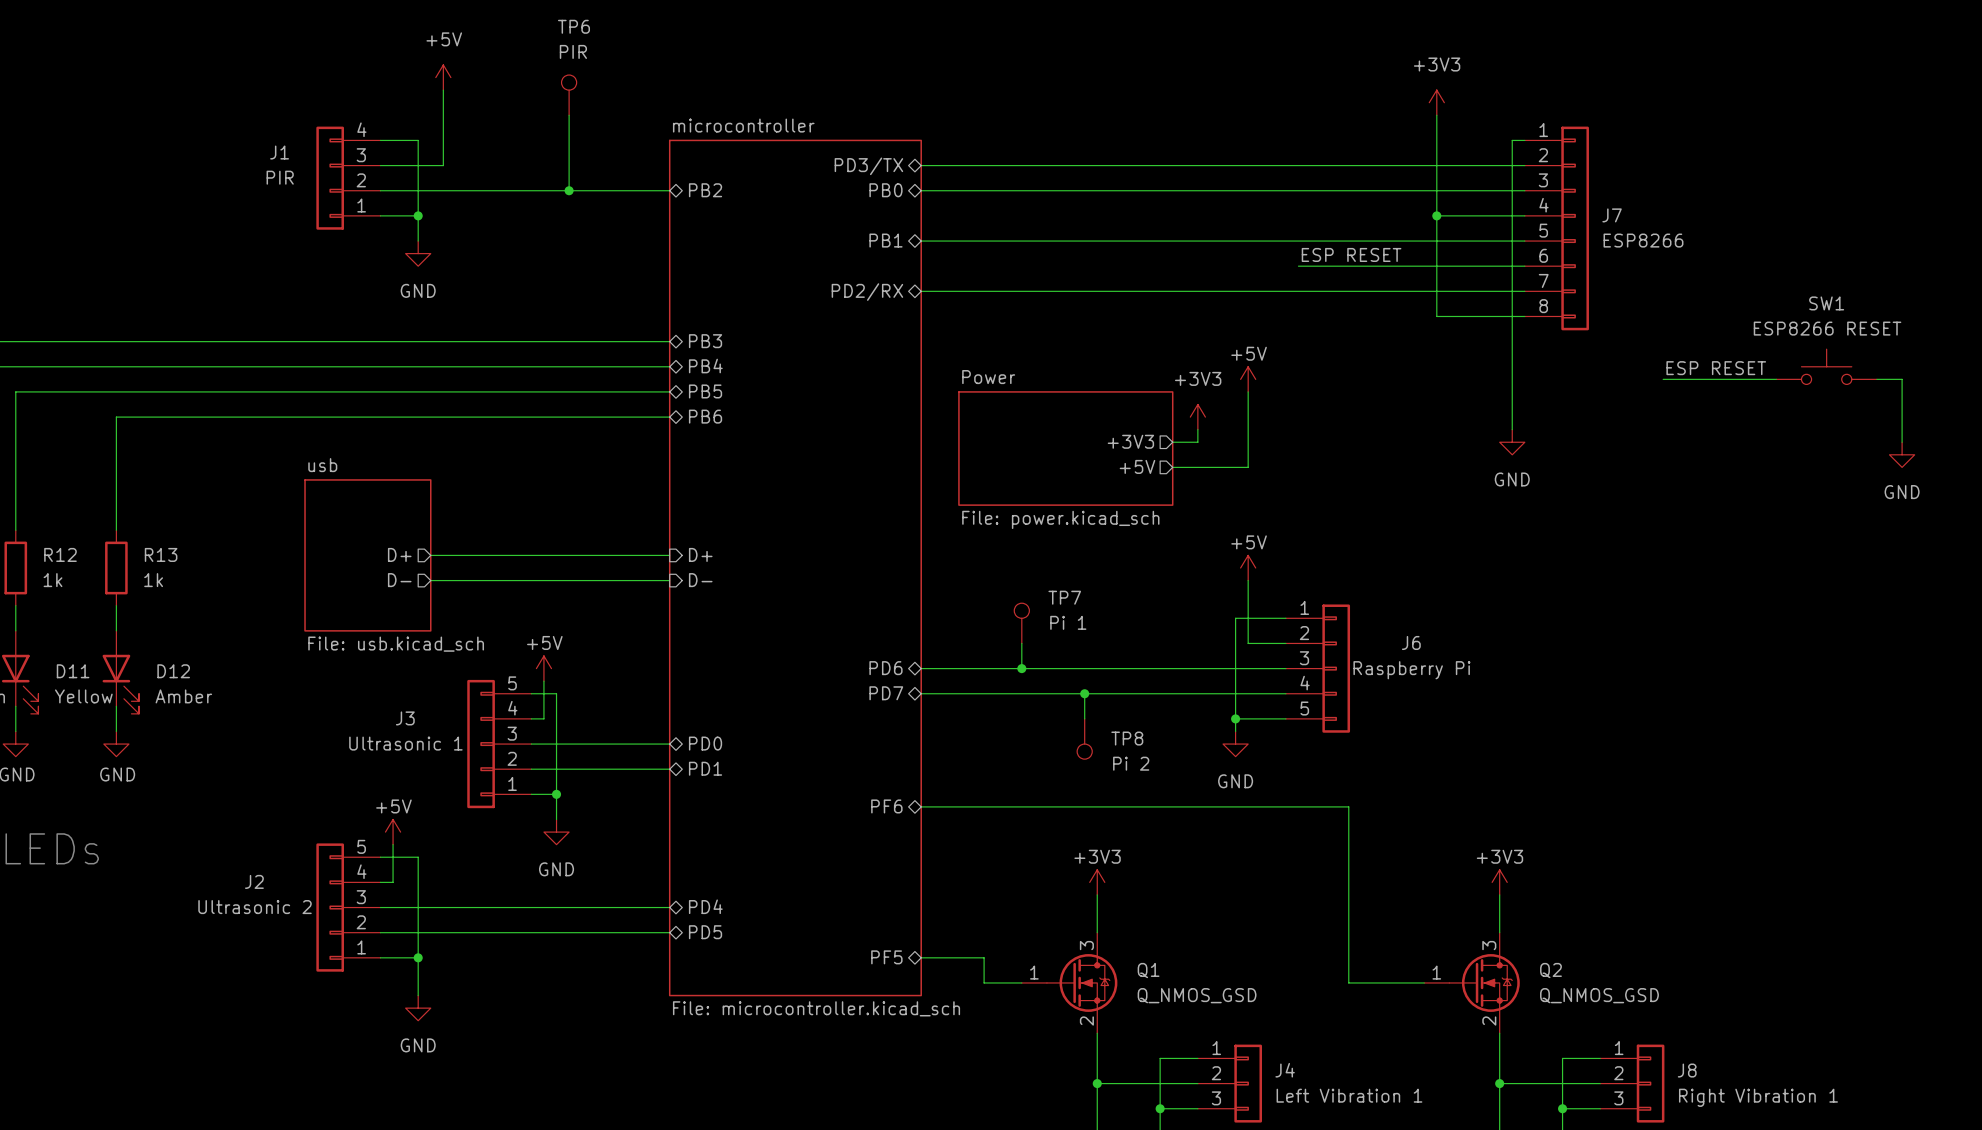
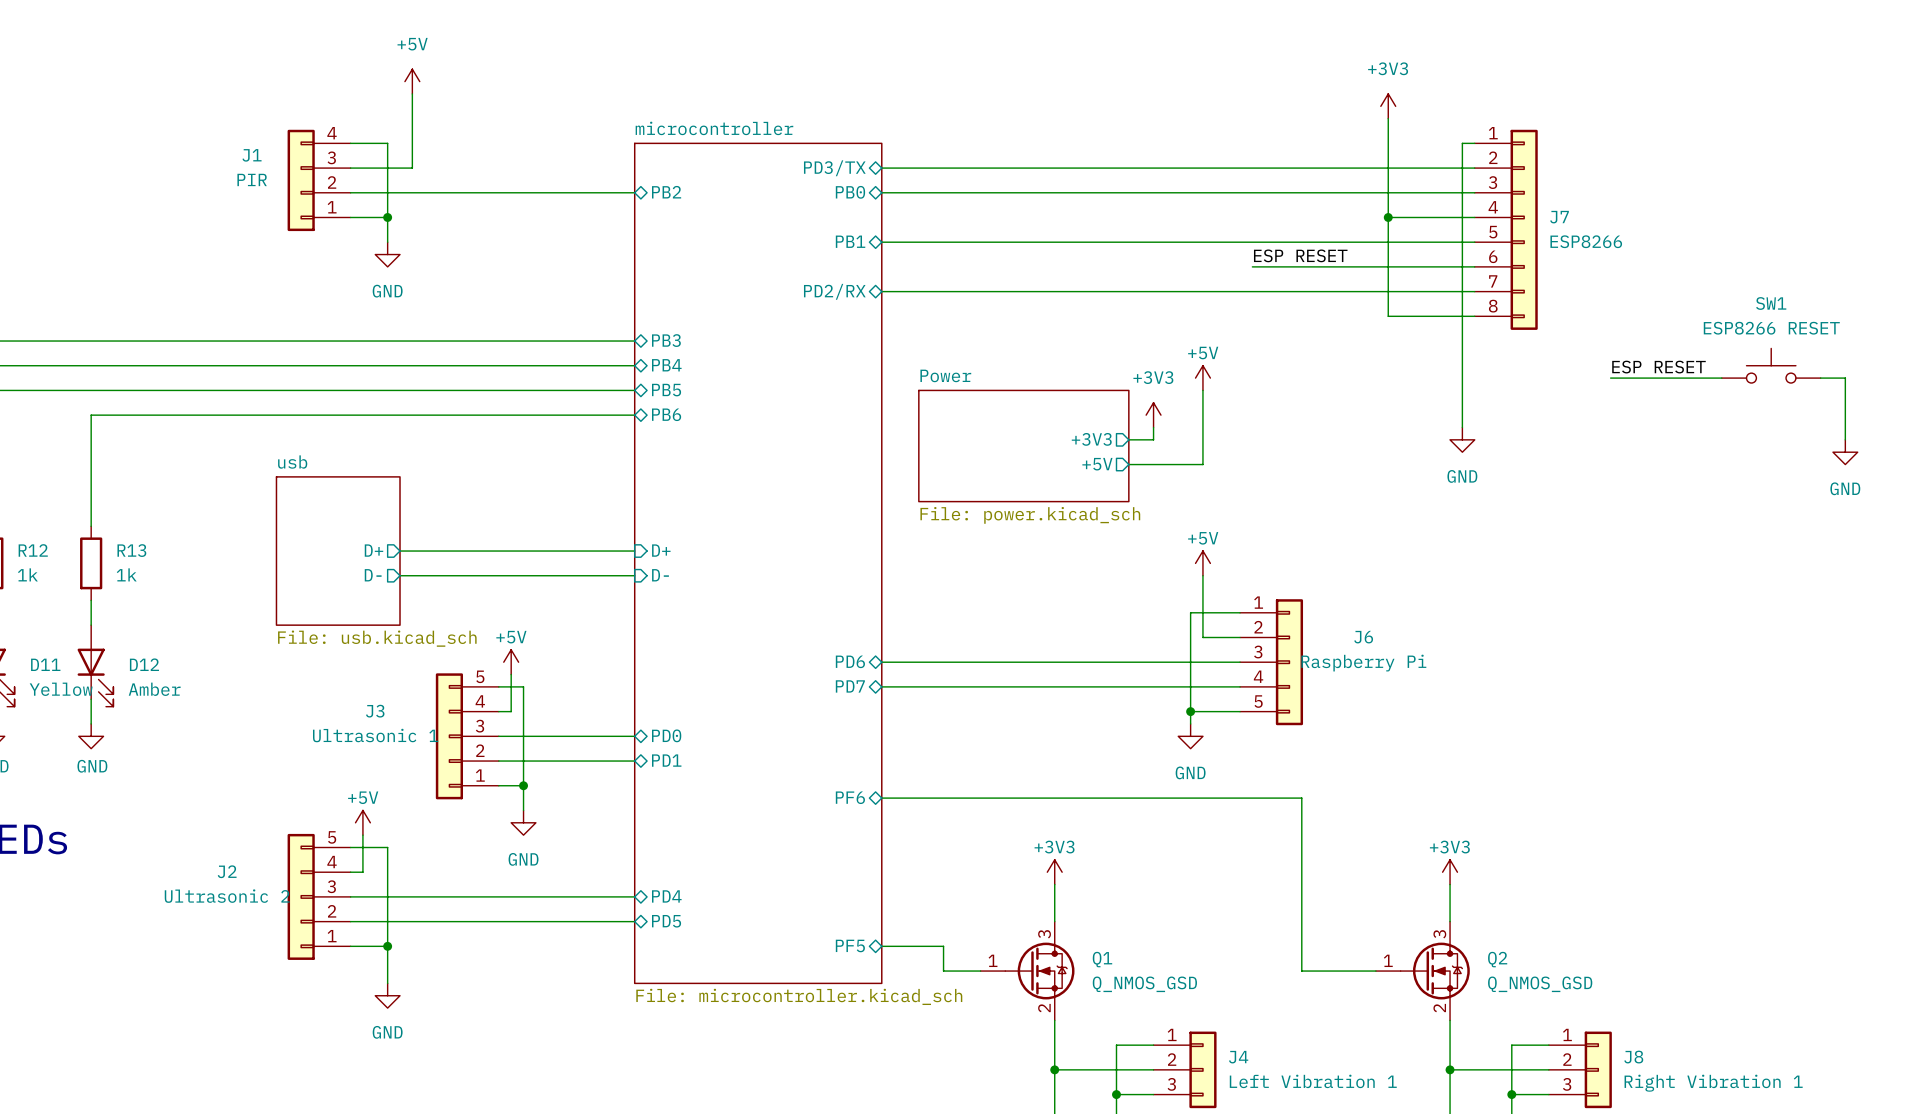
TP6: PIR (569, 95) -> none
wire: (569, 115) (569, 190) -> none
junction: (569, 190) -> none
TP7: Pi 1 (1021, 623) -> none
wire: (1021, 643) (1021, 668) -> none
junction: (1021, 668) -> none
wire: (1084, 693) (1084, 718) -> none
junction: (1084, 693) -> none
TP8: Pi 2 (1084, 739) -> none

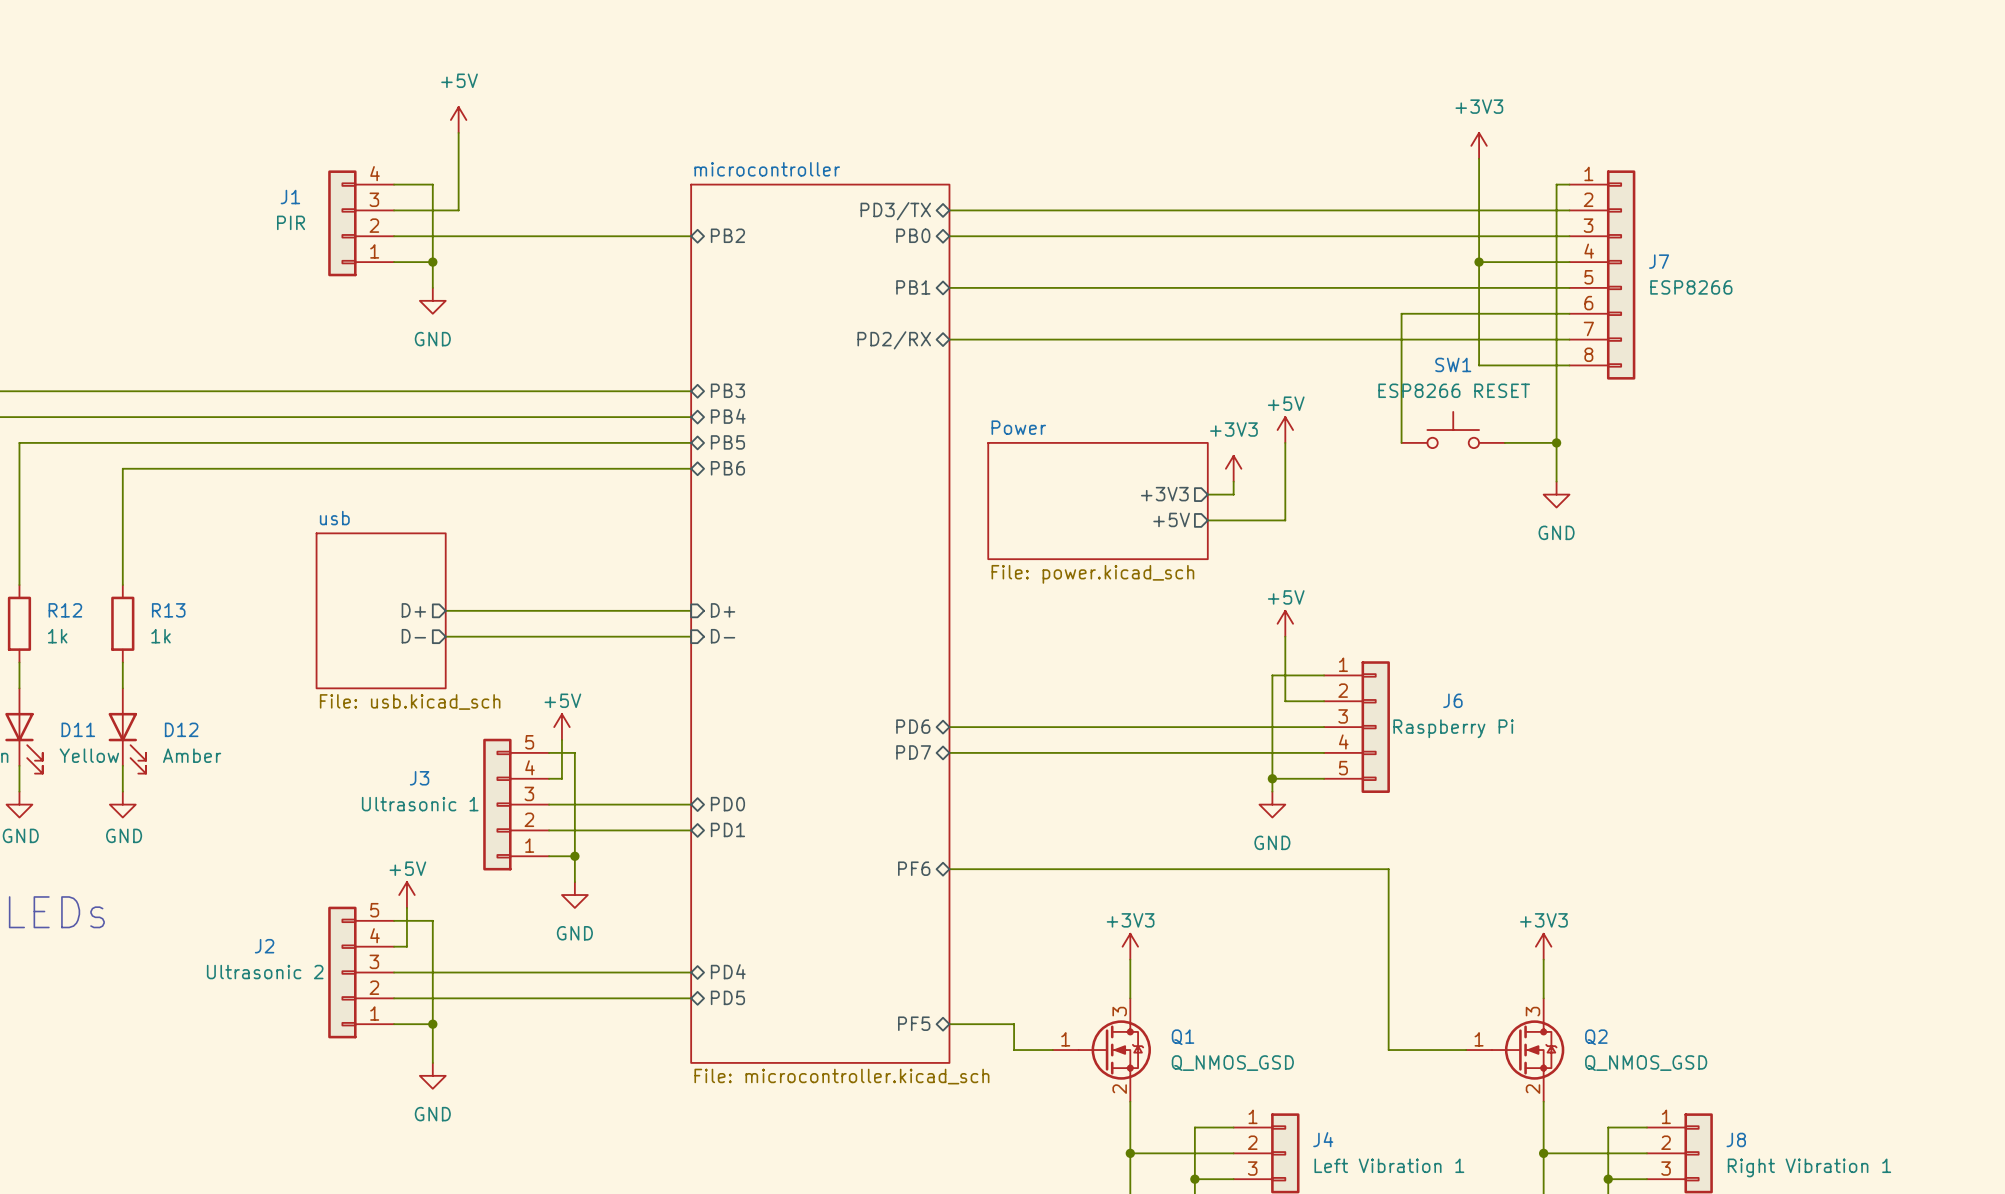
label: ESP RESET (1300, 255) -> none
wire: (1252, 266) (1314, 266) -> (1401, 442) (1401, 313)
SW1 position: (1771, 365) -> (1453, 430)
label: ESP RESET (1658, 367) -> none
wire: (1610, 378) (1721, 378) -> none
wire: (1820, 378) (1845, 378) (1845, 439) -> none
wire: none -> (1504, 442) (1556, 442)
junction: none -> (1556, 442)
power symbol: GND (1845, 452) -> none

